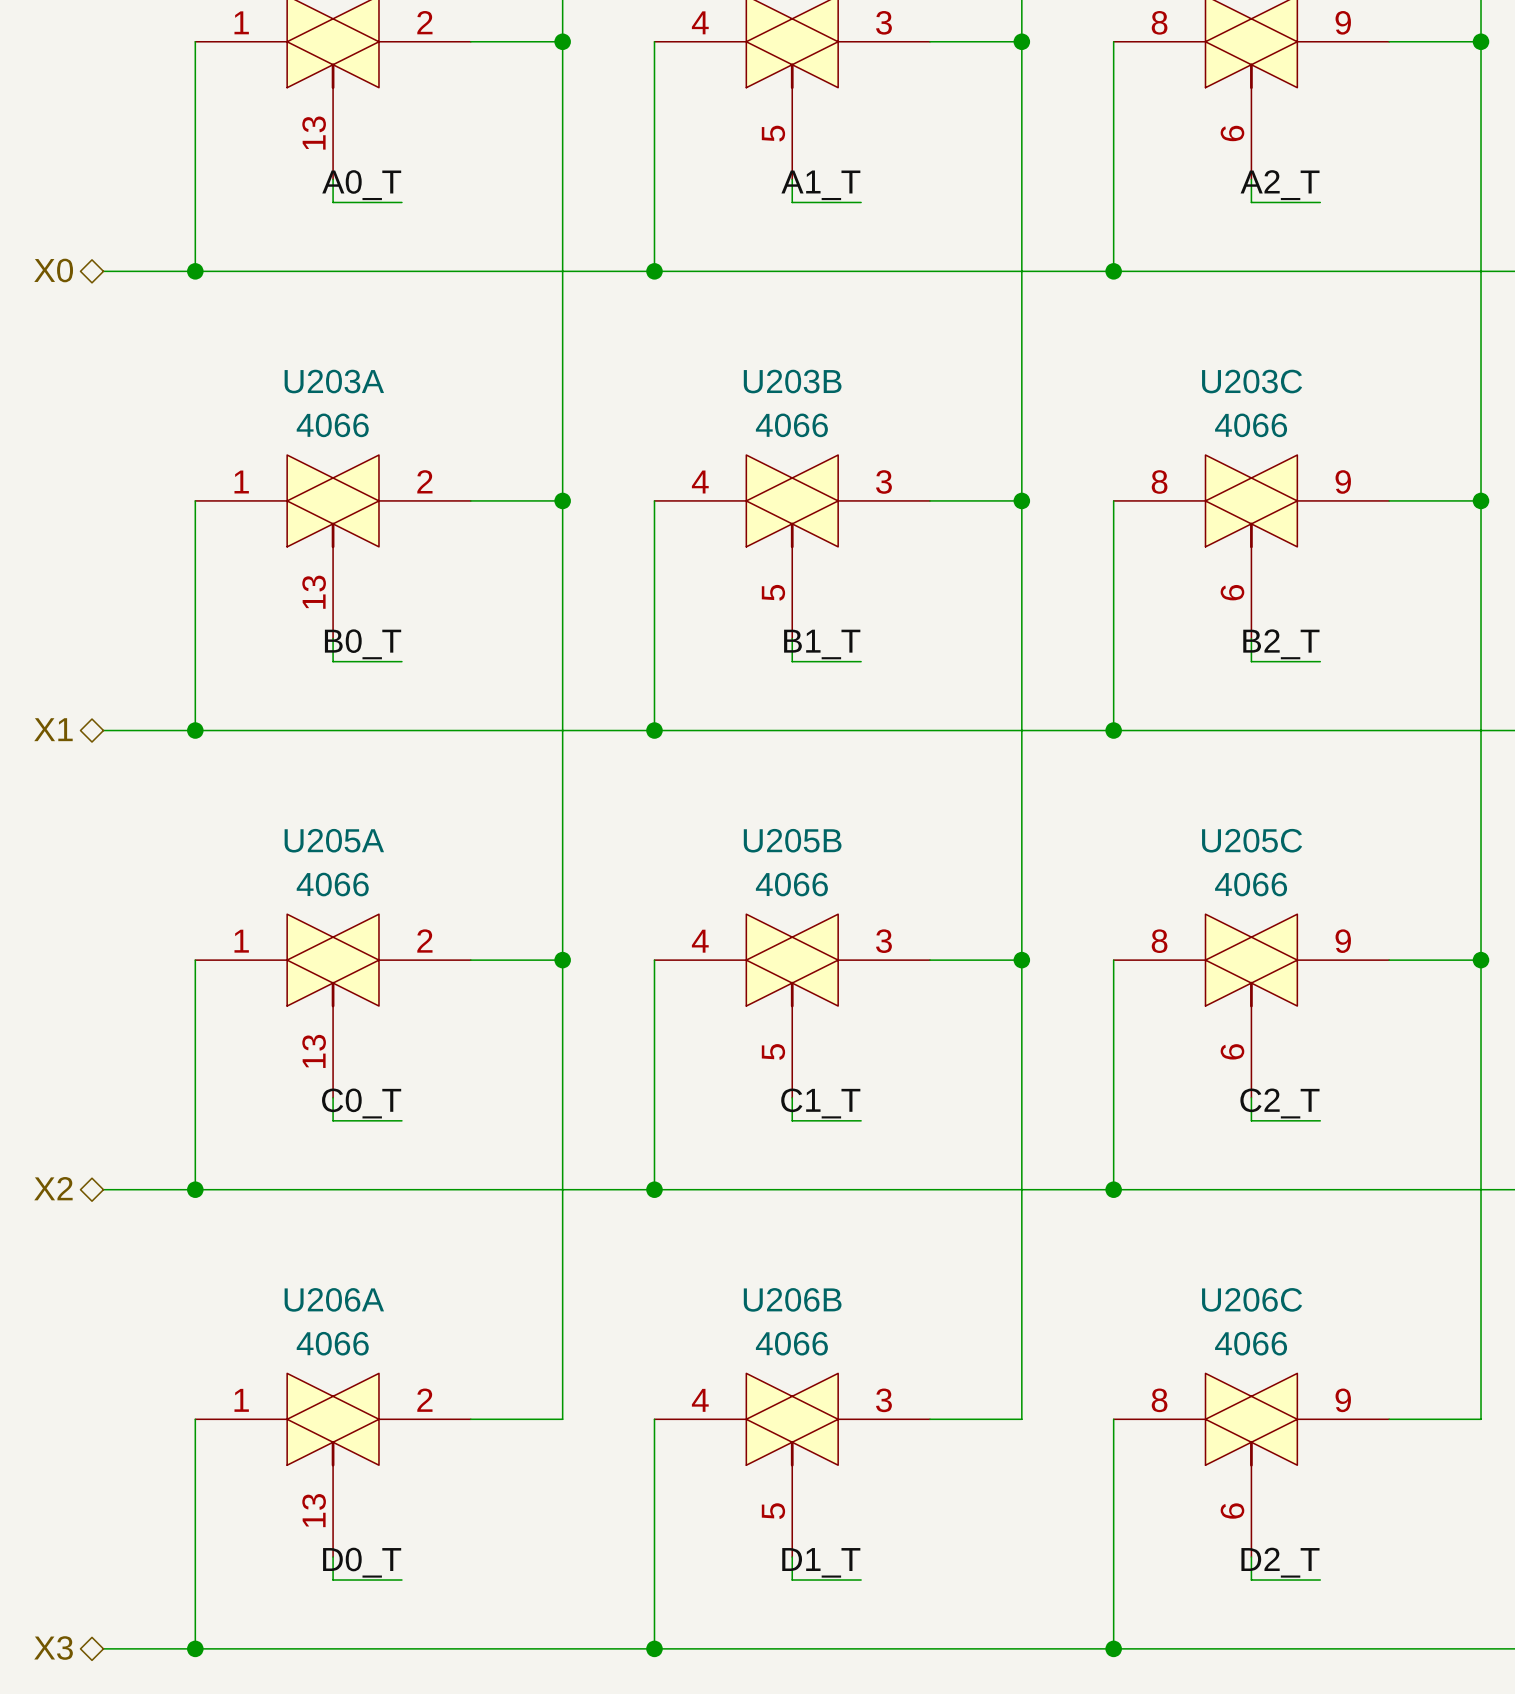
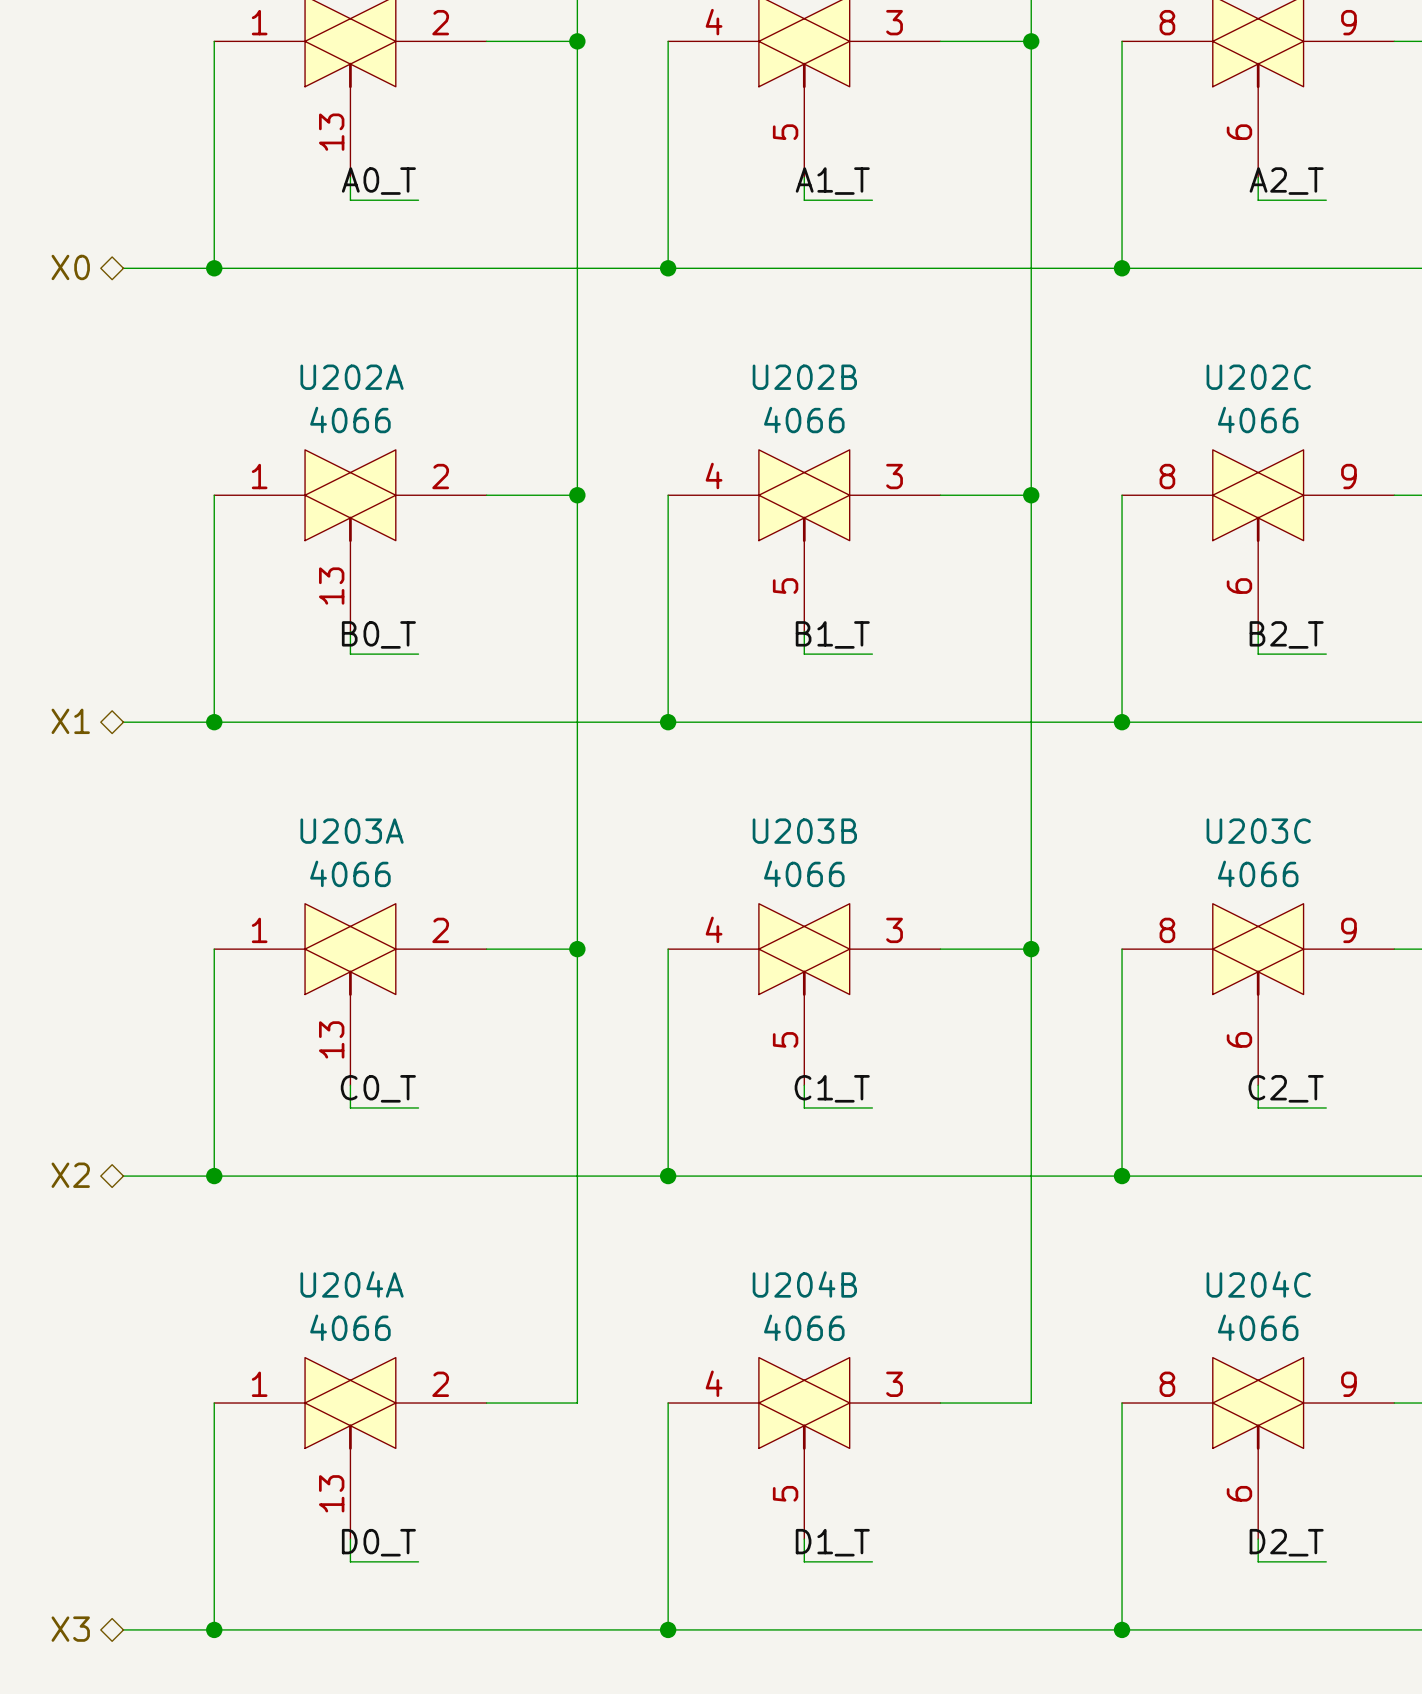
U203A name: U203A (334, 381) -> U202A (352, 377)
U203B name: U203B (792, 381) -> U202B (804, 377)
U203C name: U203C (1252, 381) -> U202C (1258, 377)
U205A name: U205A (334, 840) -> U203A (352, 831)
U205B name: U205B (792, 840) -> U203B (804, 831)
U205C name: U205C (1252, 840) -> U203C (1258, 831)
U206A name: U206A (334, 1299) -> U204A (352, 1284)
U206B name: U206B (792, 1299) -> U204B (804, 1284)
U206C name: U206C (1252, 1299) -> U204C (1258, 1284)

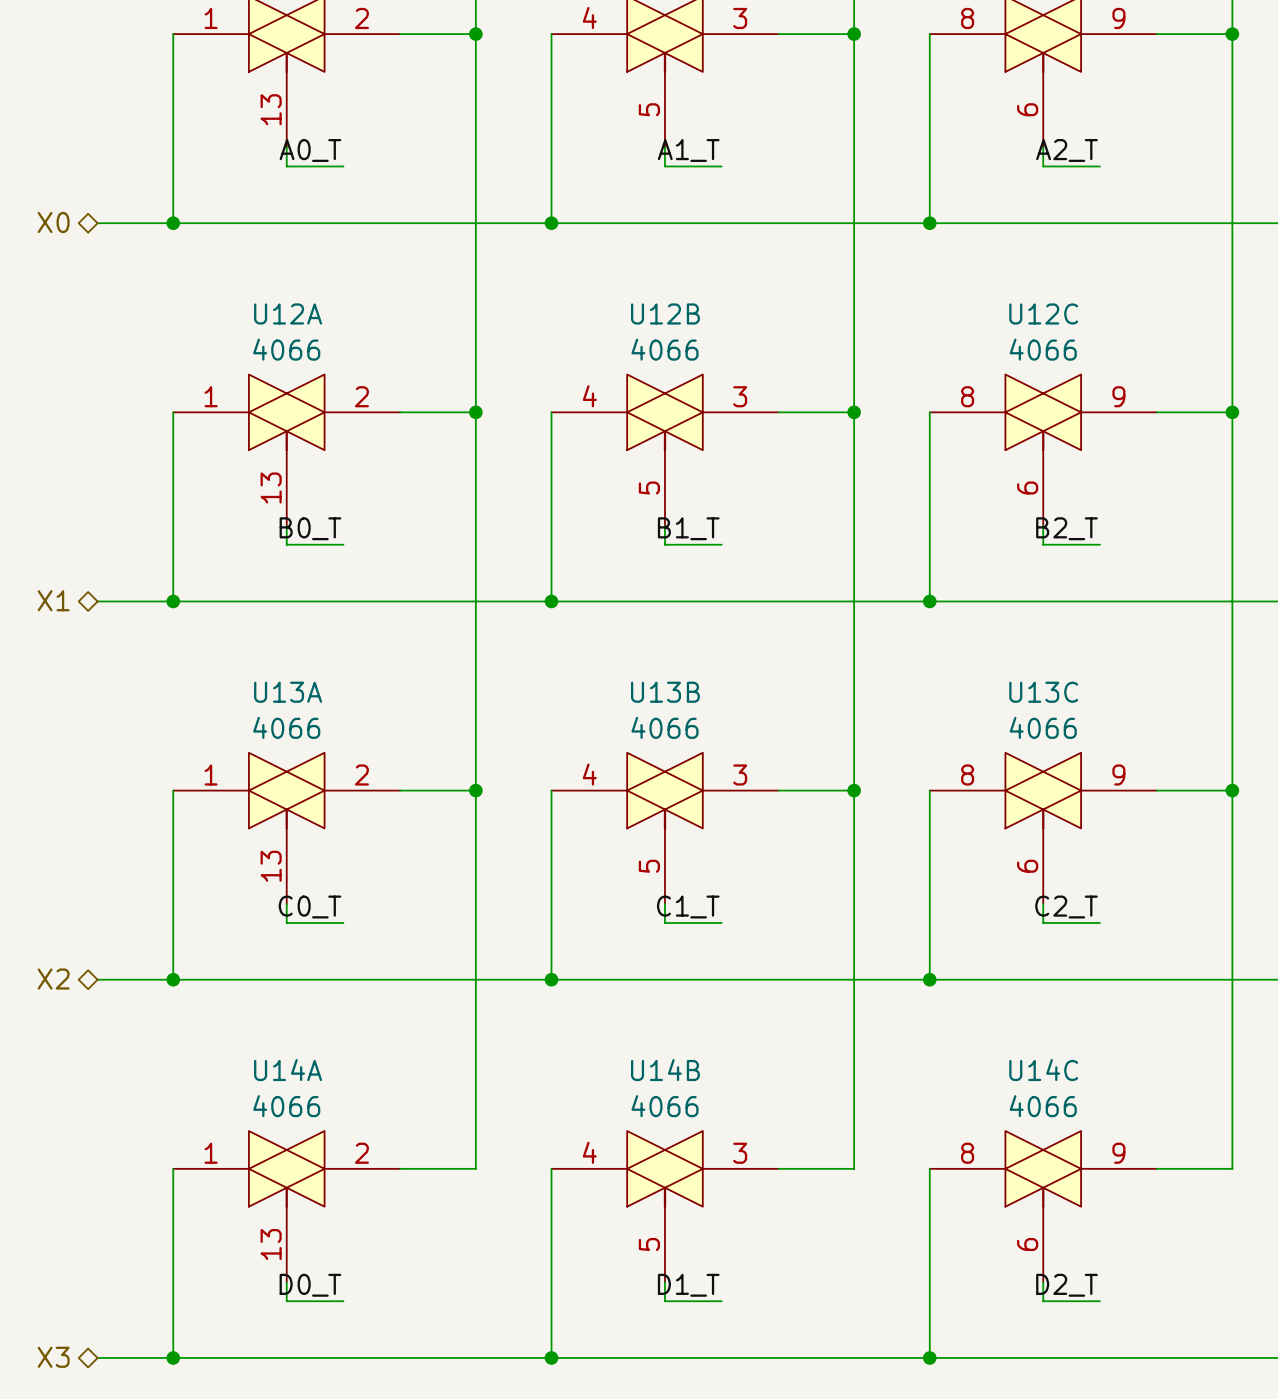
U202A name: U202A (352, 377) -> U12A (288, 313)
U202B name: U202B (804, 377) -> U12B (665, 313)
U202C name: U202C (1258, 377) -> U12C (1043, 313)
U203A name: U203A (352, 831) -> U13A (288, 692)
U203B name: U203B (804, 831) -> U13B (665, 692)
U203C name: U203C (1258, 831) -> U13C (1043, 692)
U204A name: U204A (352, 1284) -> U14A (288, 1070)
U204B name: U204B (804, 1284) -> U14B (665, 1070)
U204C name: U204C (1258, 1284) -> U14C (1043, 1070)

